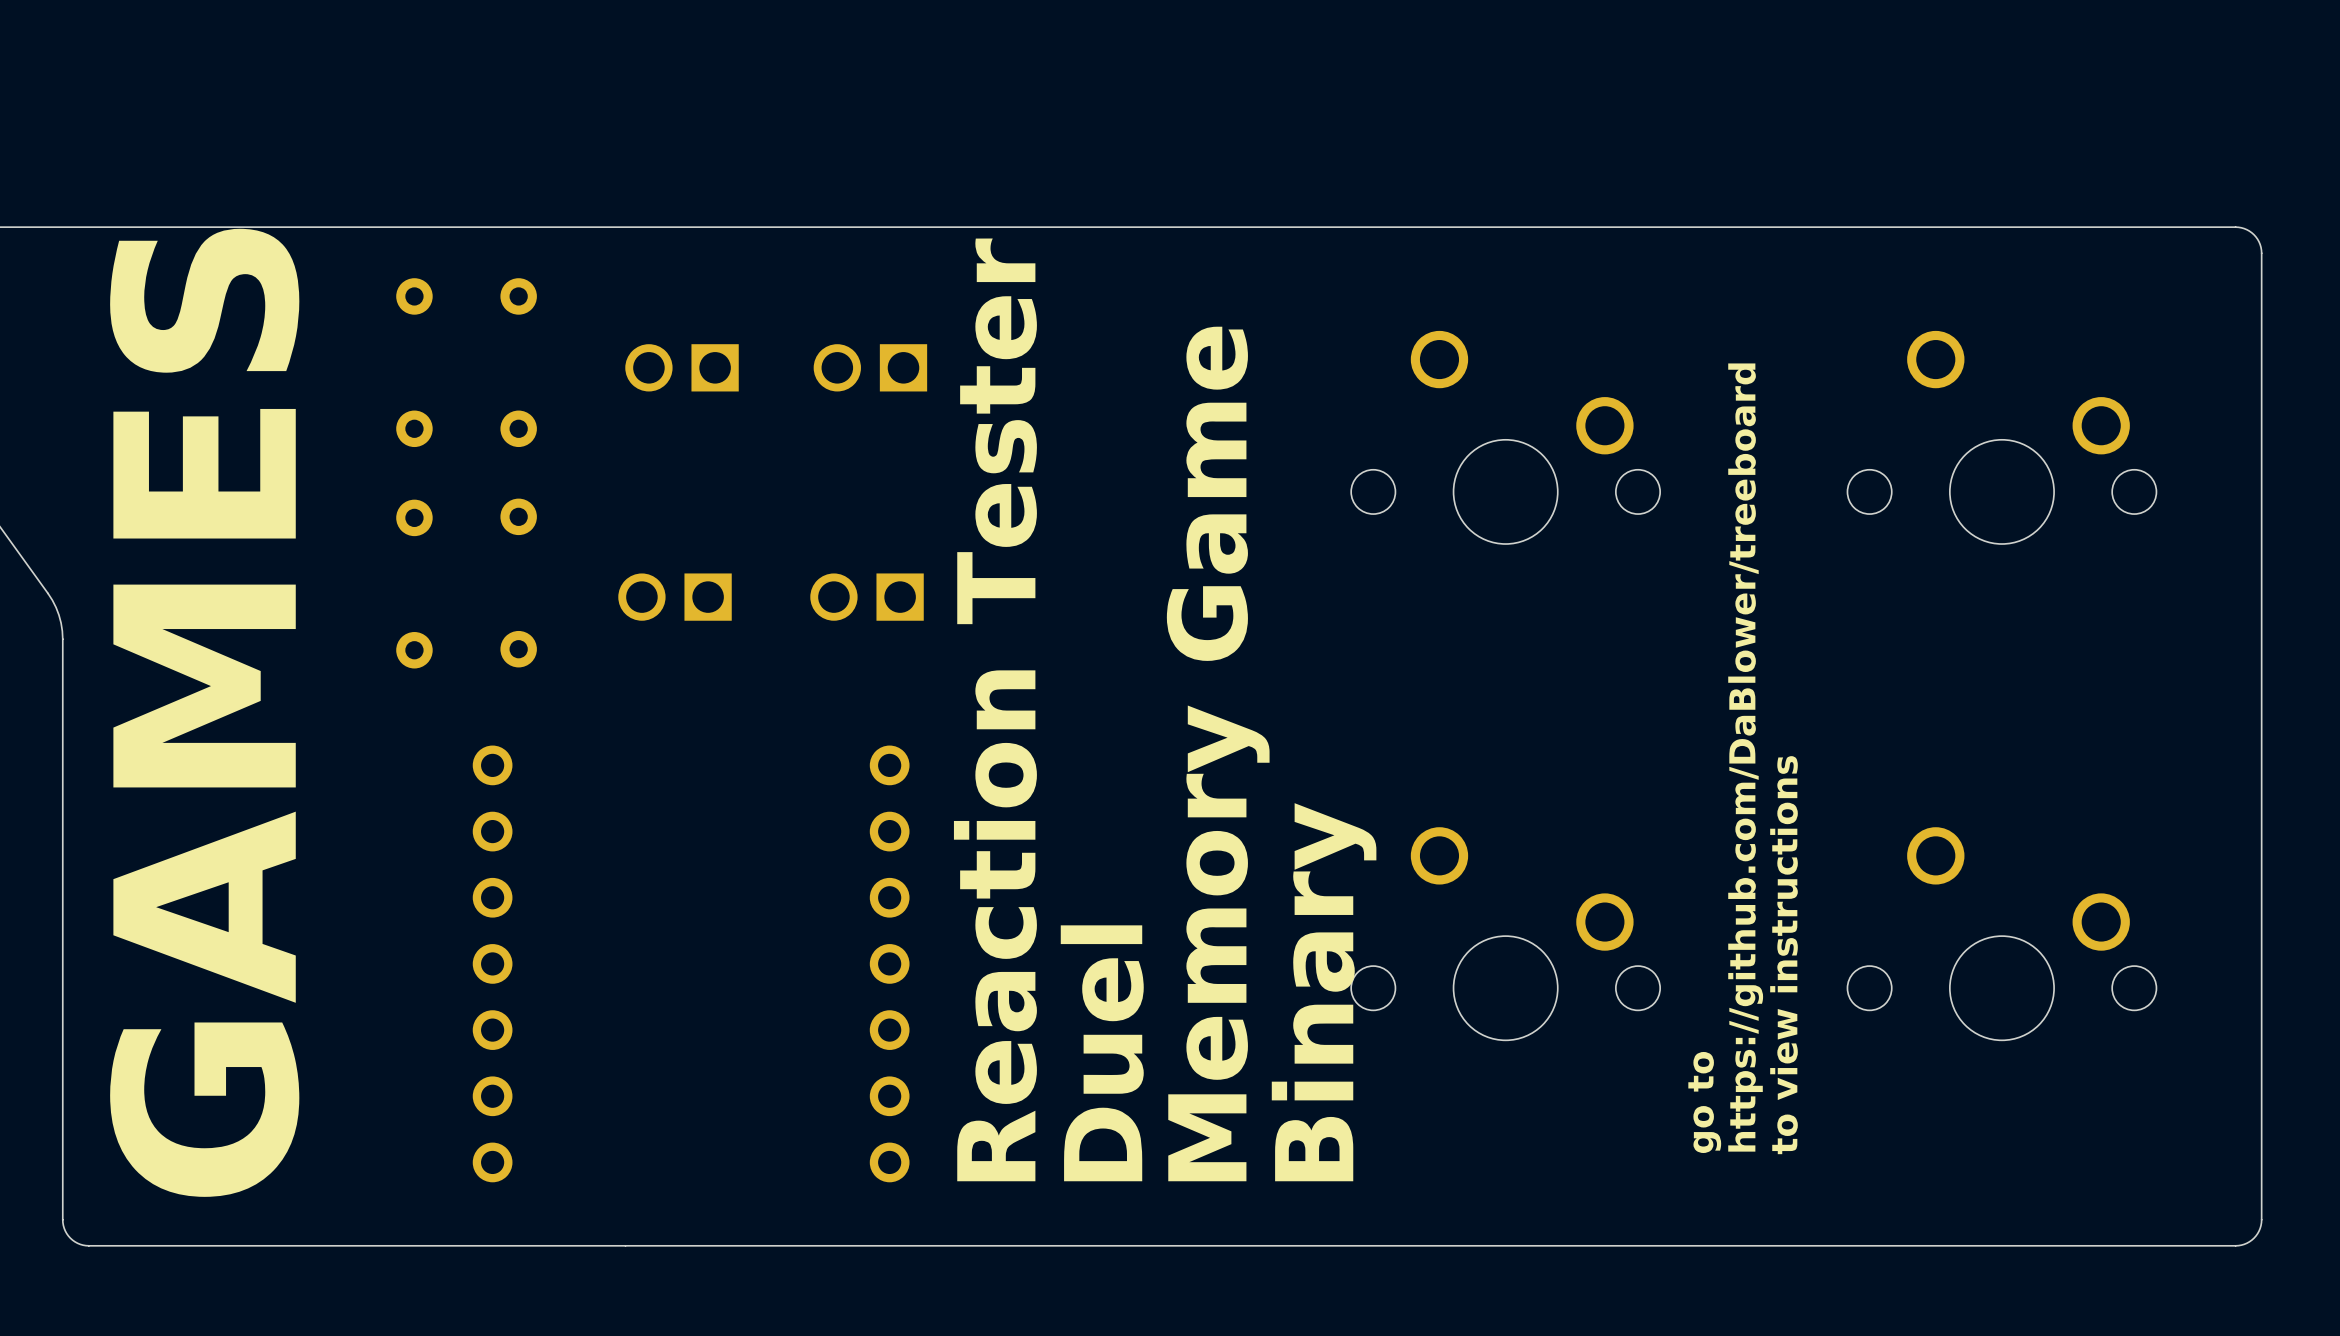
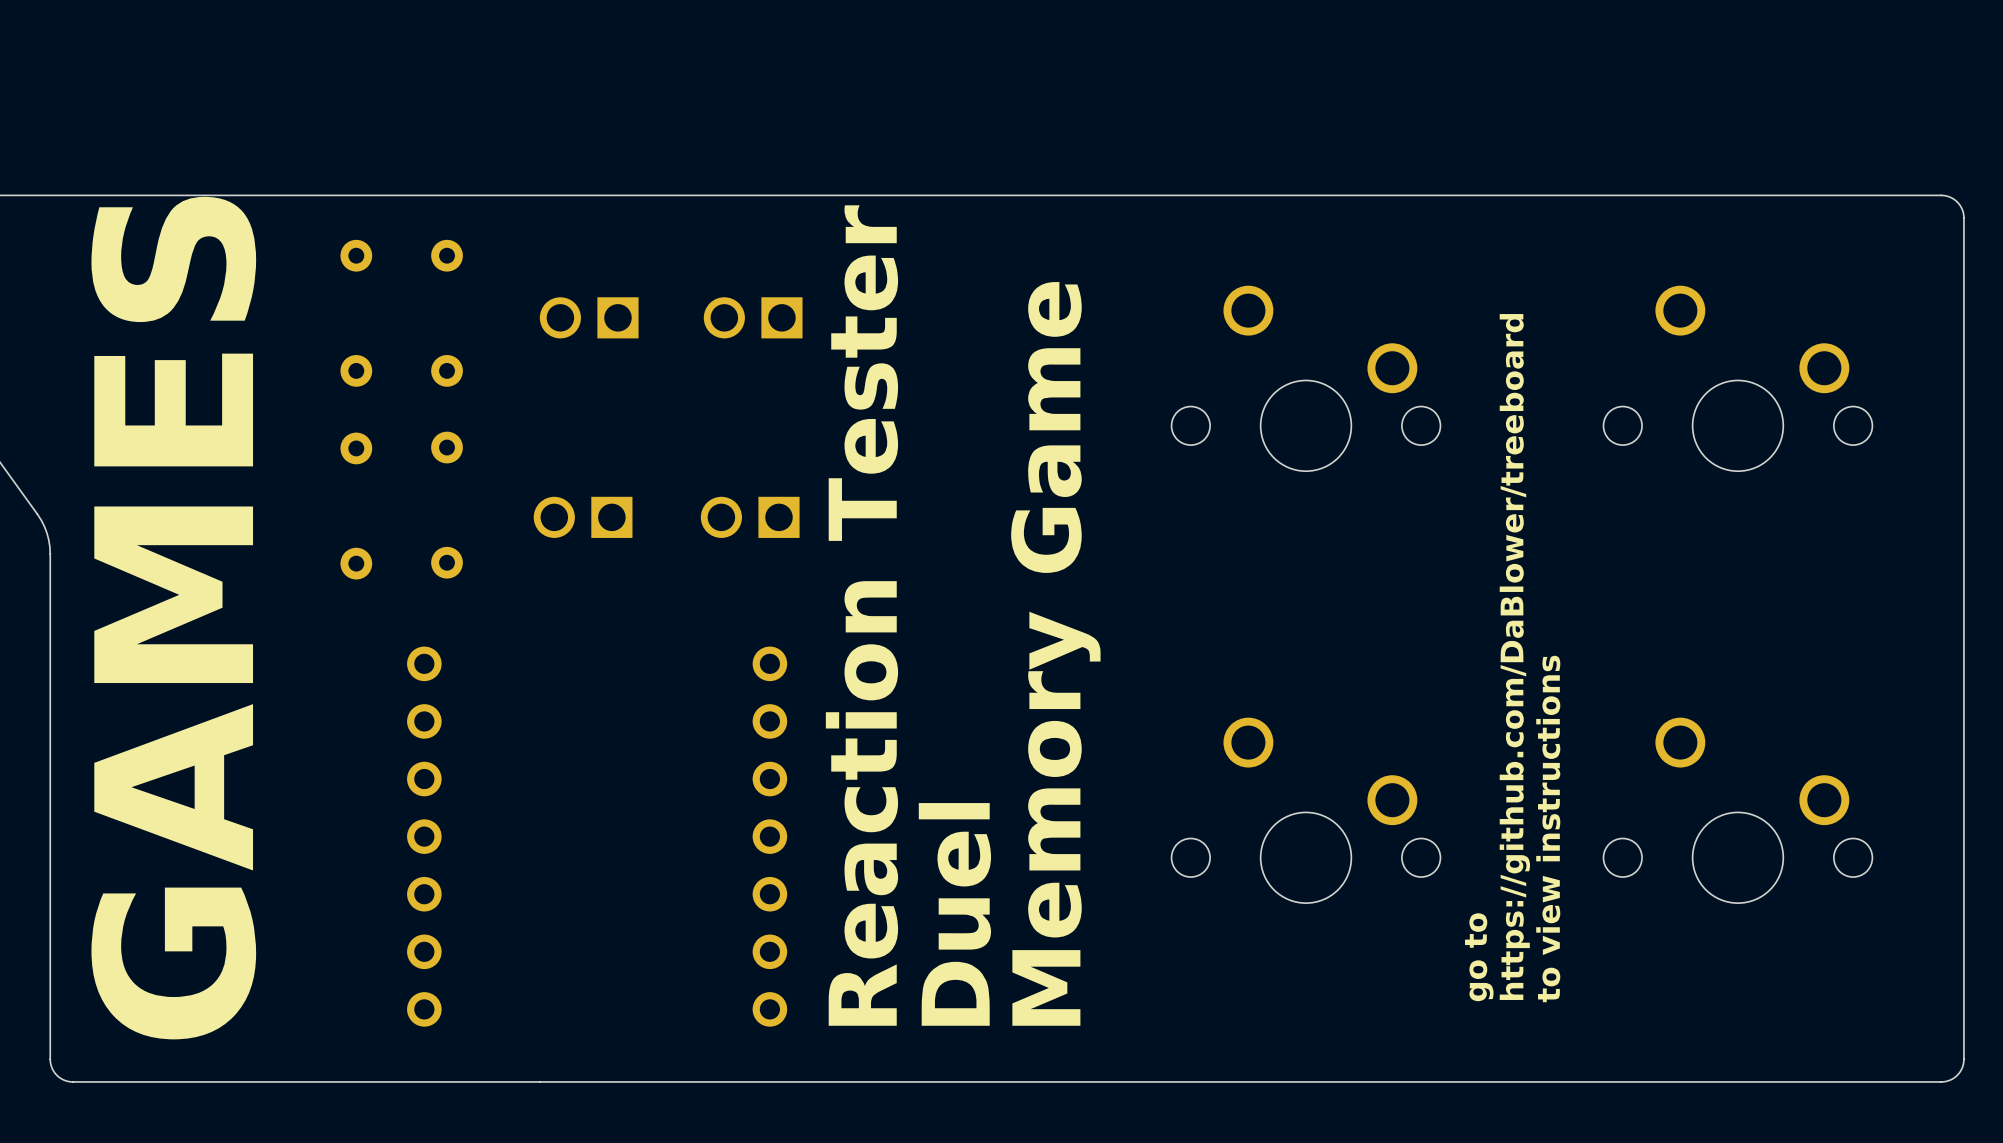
text: Binary (1324, 992) -> none

